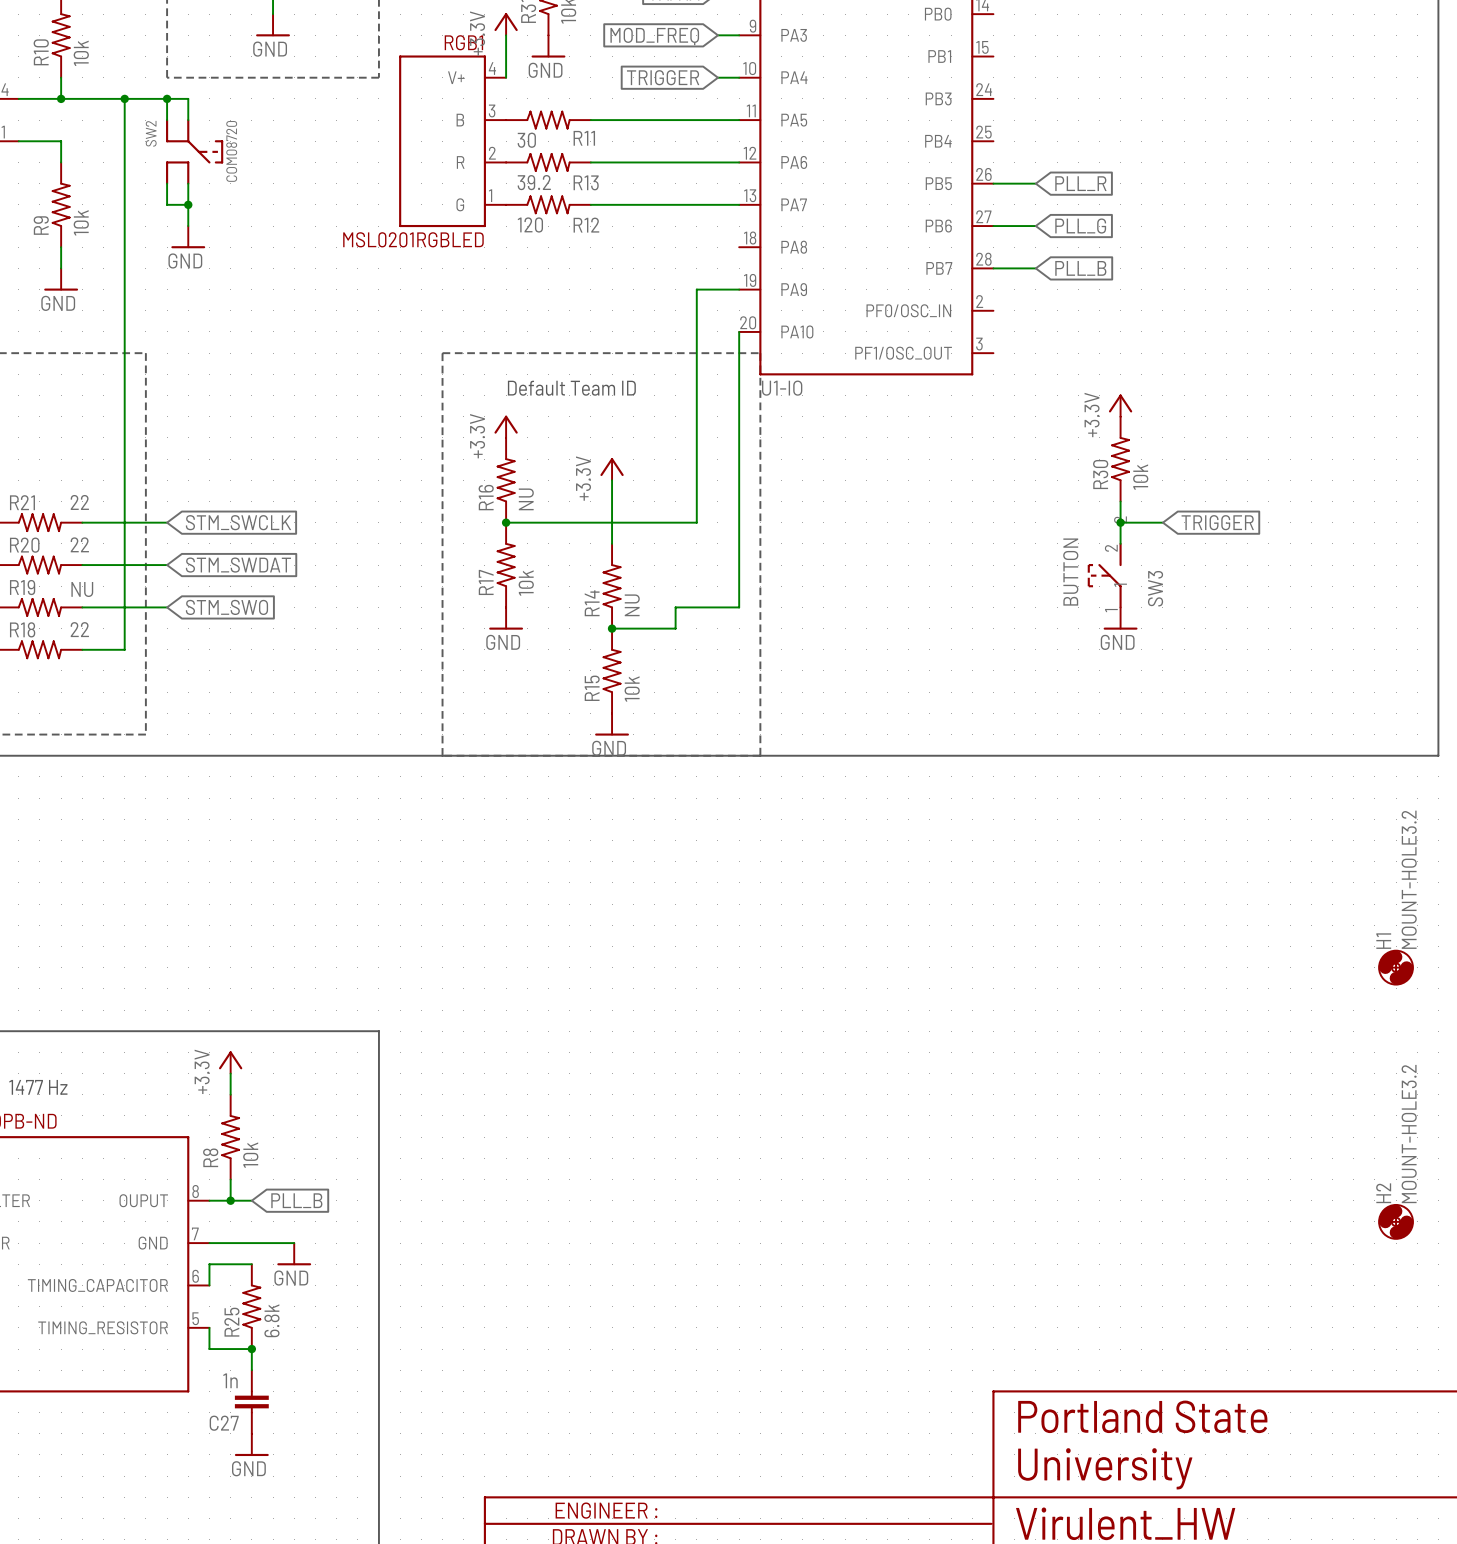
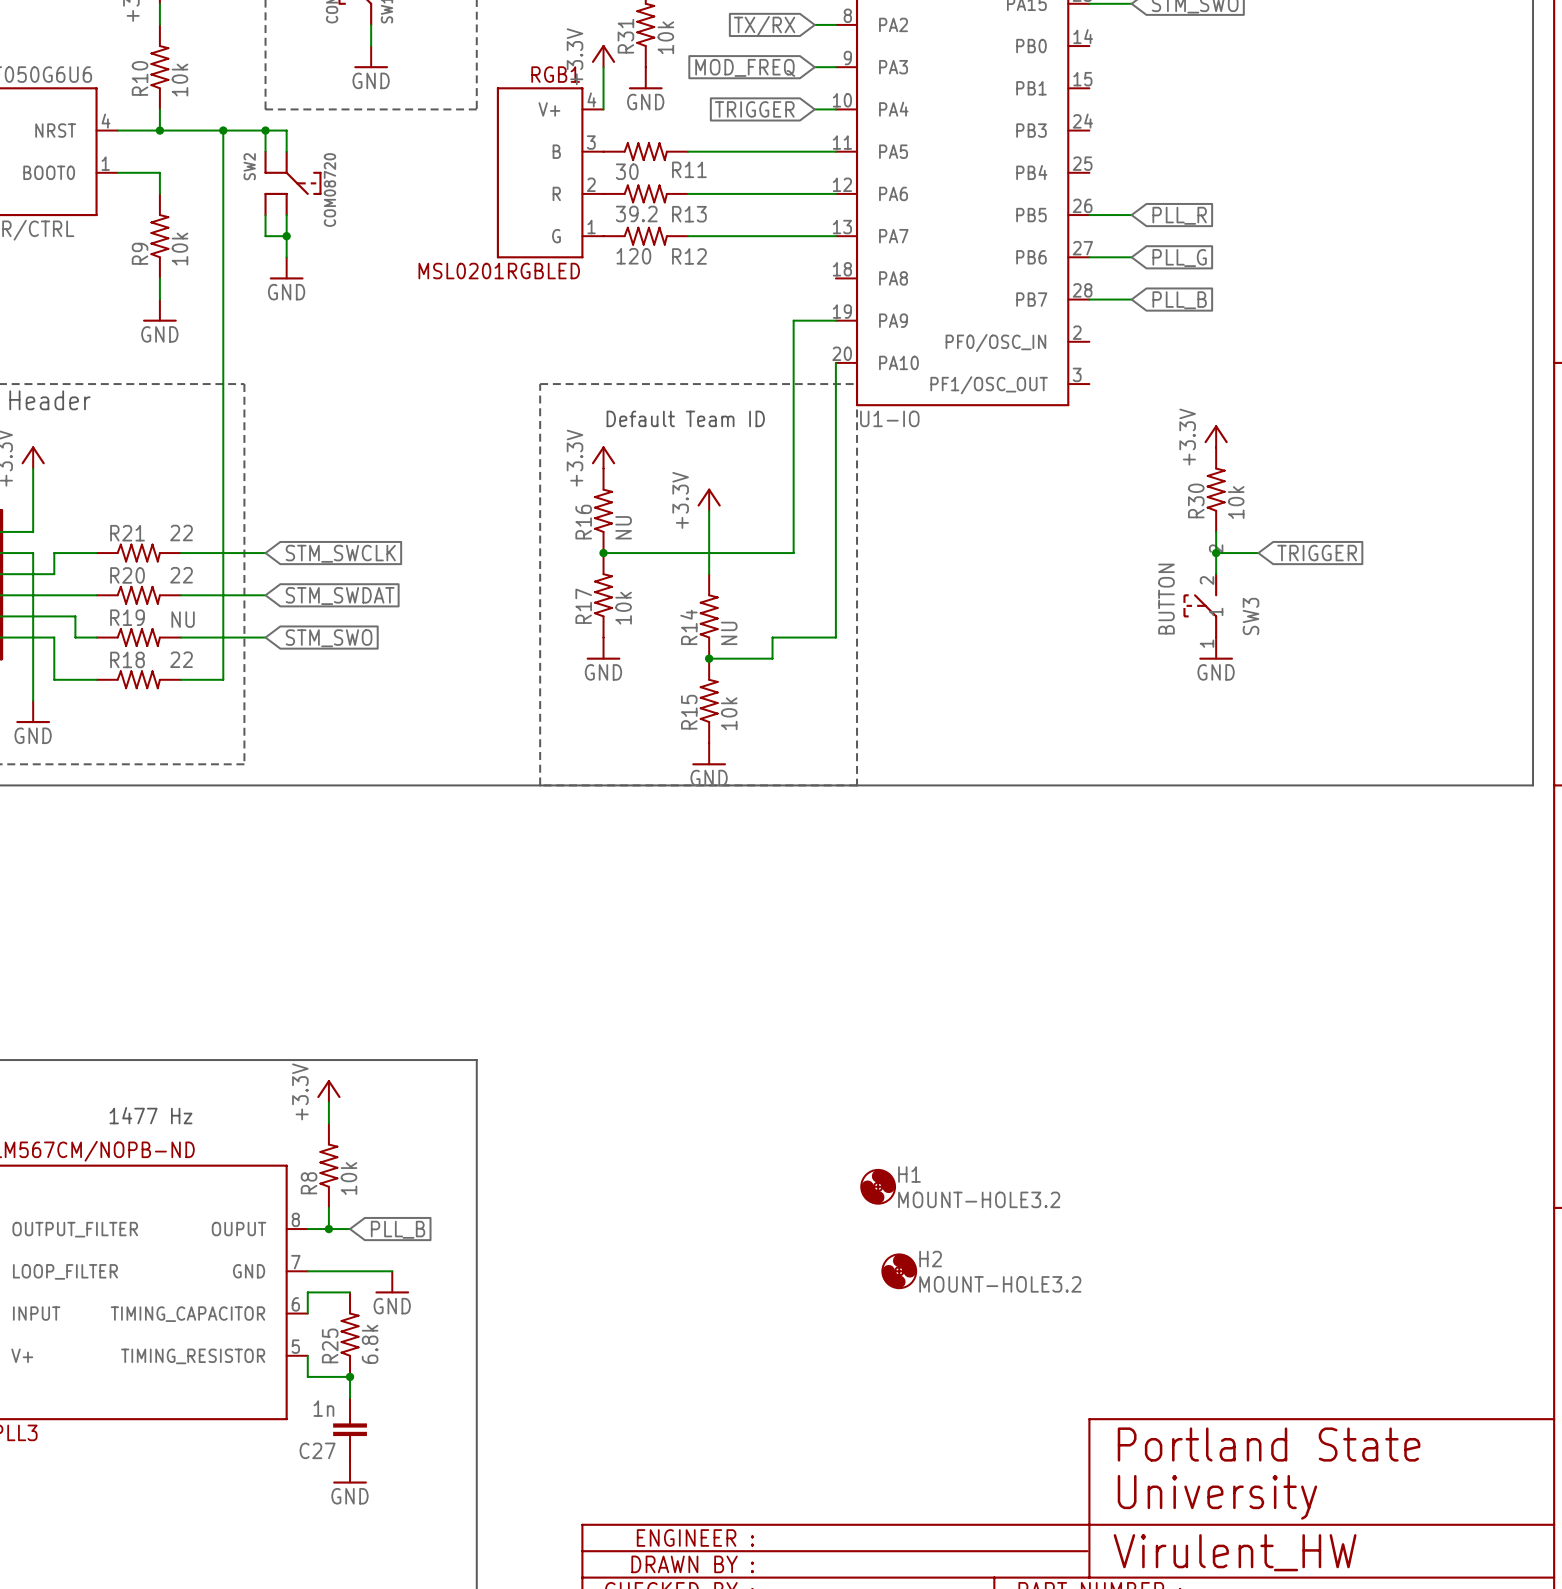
H1 rotation: 0° (1396, 967) -> 90° clockwise (878, 1186)
H1 position: (1396, 967) -> (878, 1186)
H2 rotation: 0° (1396, 1221) -> 90° clockwise (899, 1271)
H2 position: (1396, 1221) -> (899, 1271)

